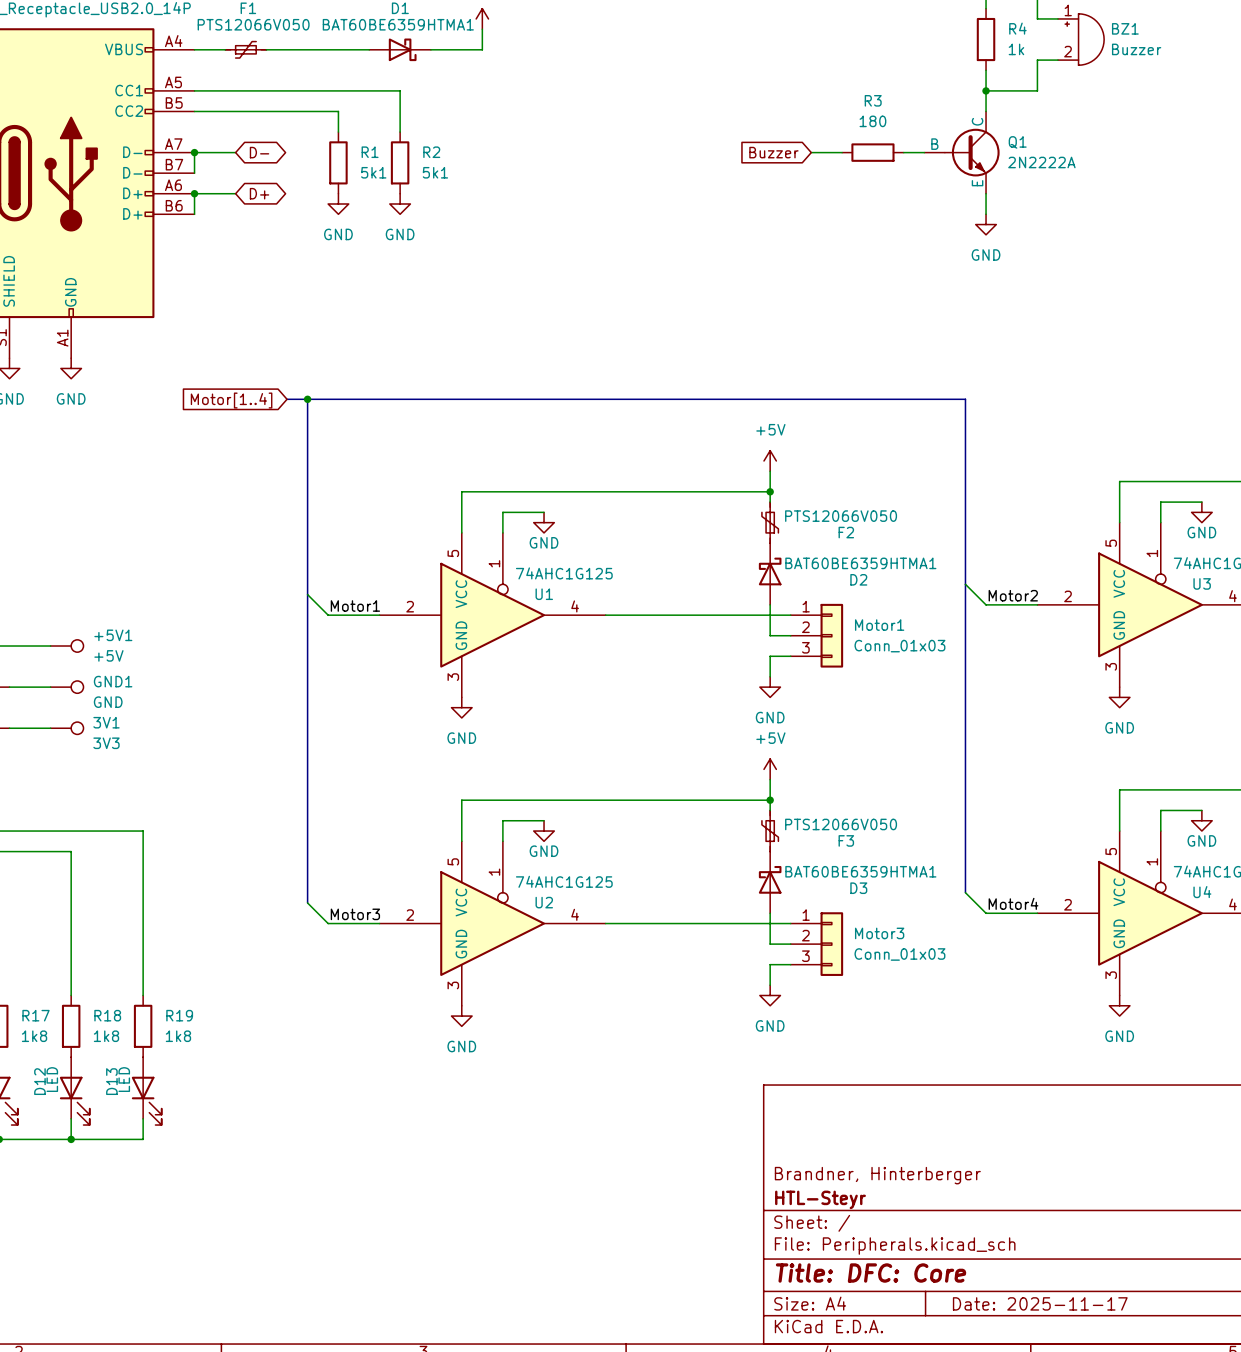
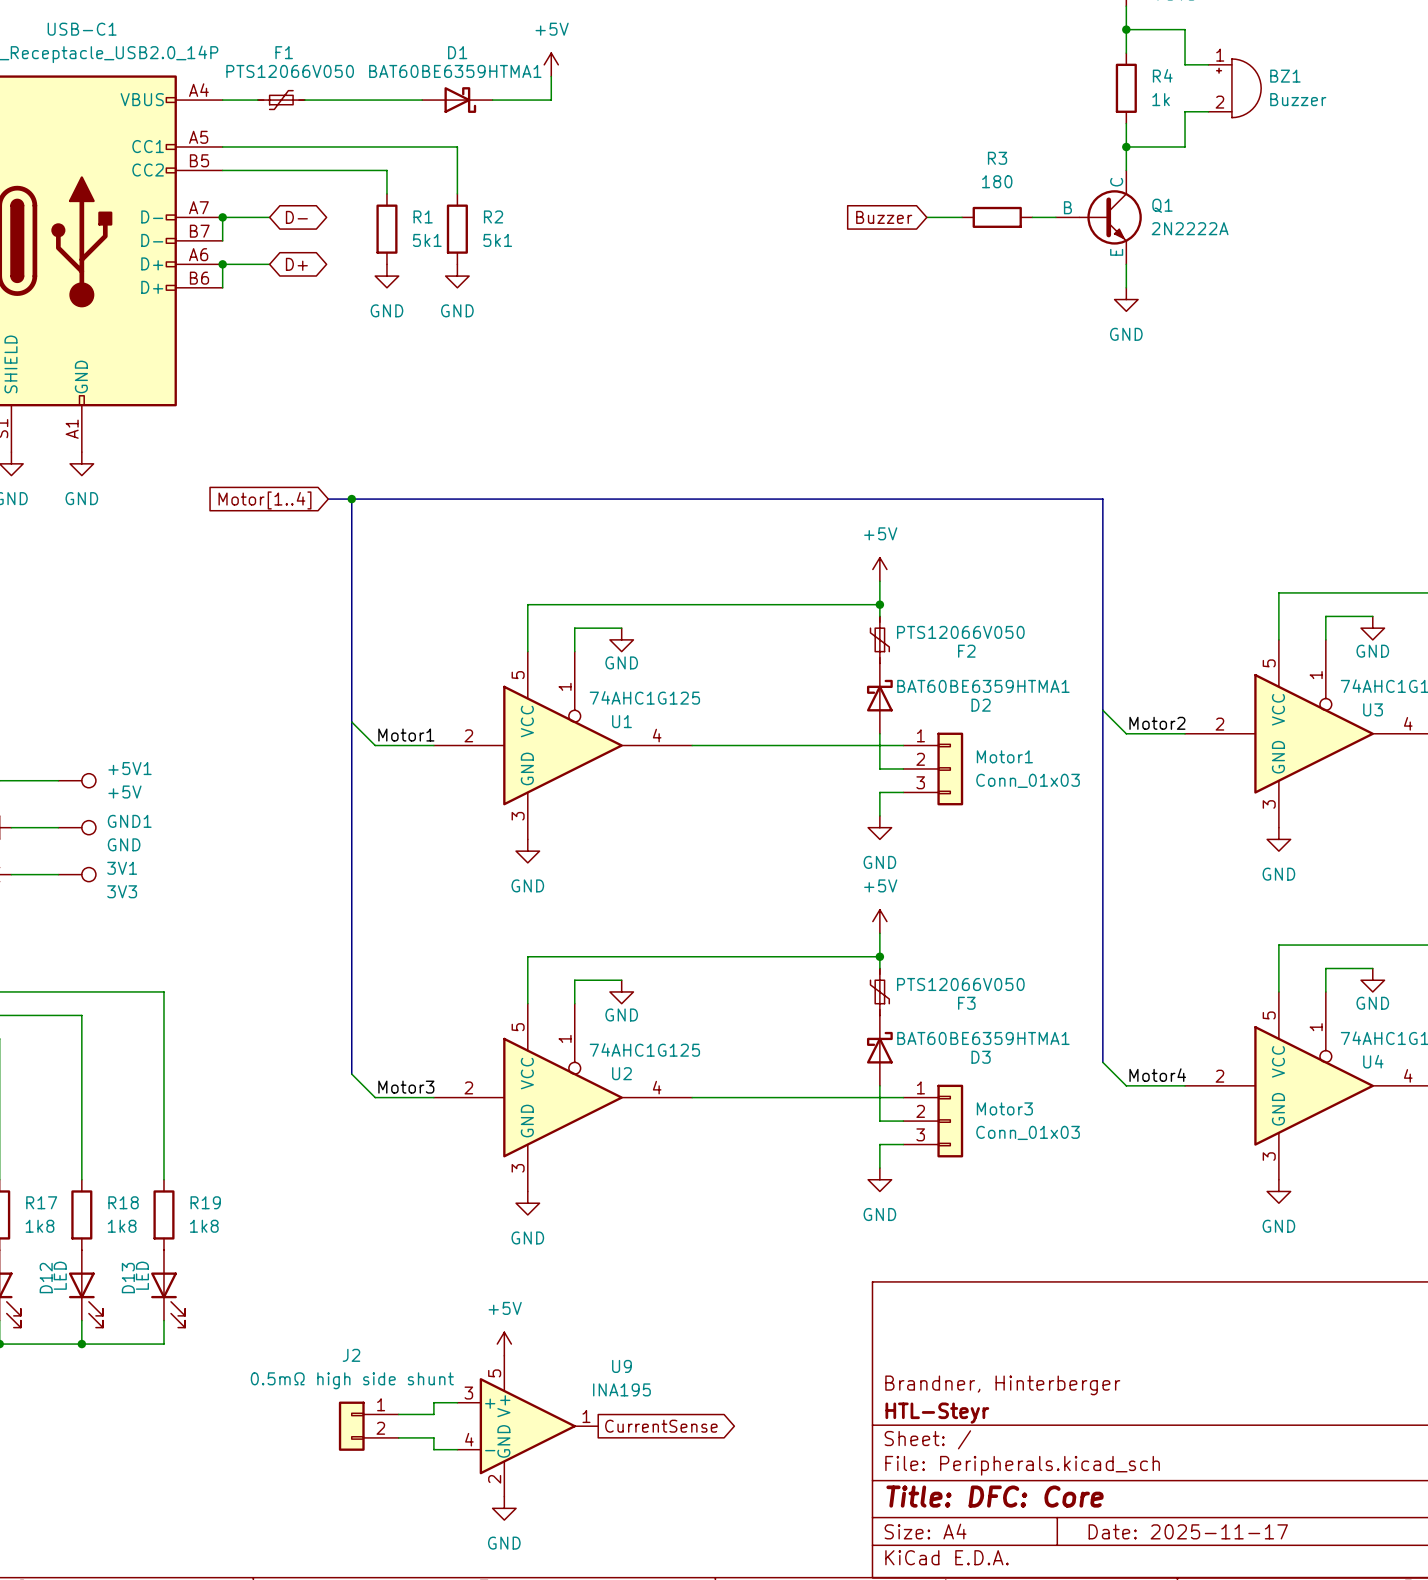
power symbol: none -> +5V (504, 1344)
wire: none -> (457, 1402) (433, 1402) (433, 1414) (398, 1414)
J2: none -> 0.5mΩ high side shunt (368, 1426)
U9: none -> INA195 (527, 1426)
global label: none -> CurrentSense (661, 1426)
wire: none -> (398, 1437) (433, 1437) (433, 1449) (457, 1449)
power symbol: none -> GND (504, 1508)

